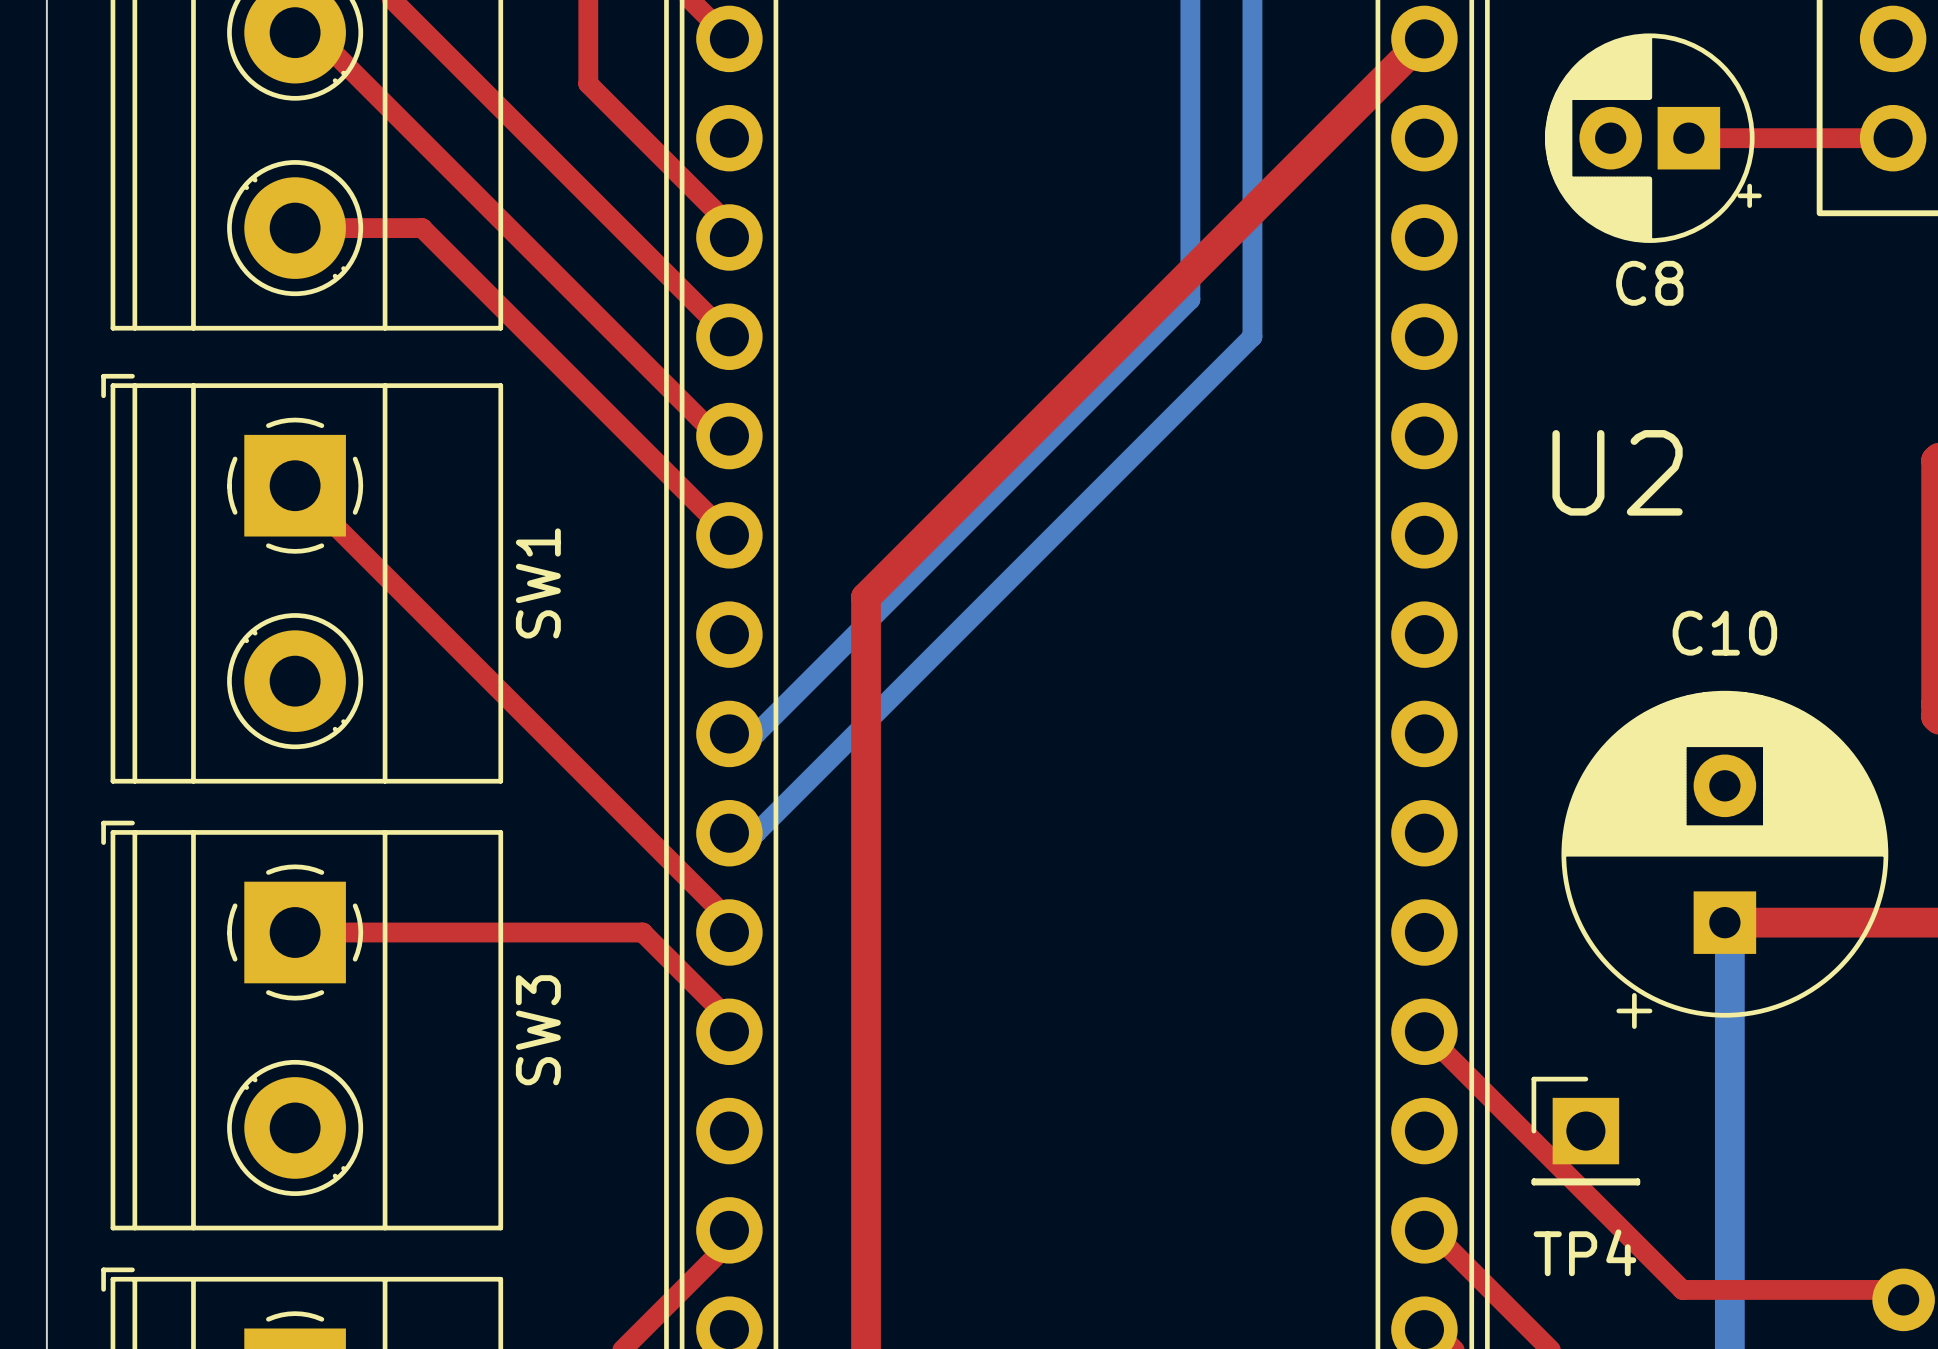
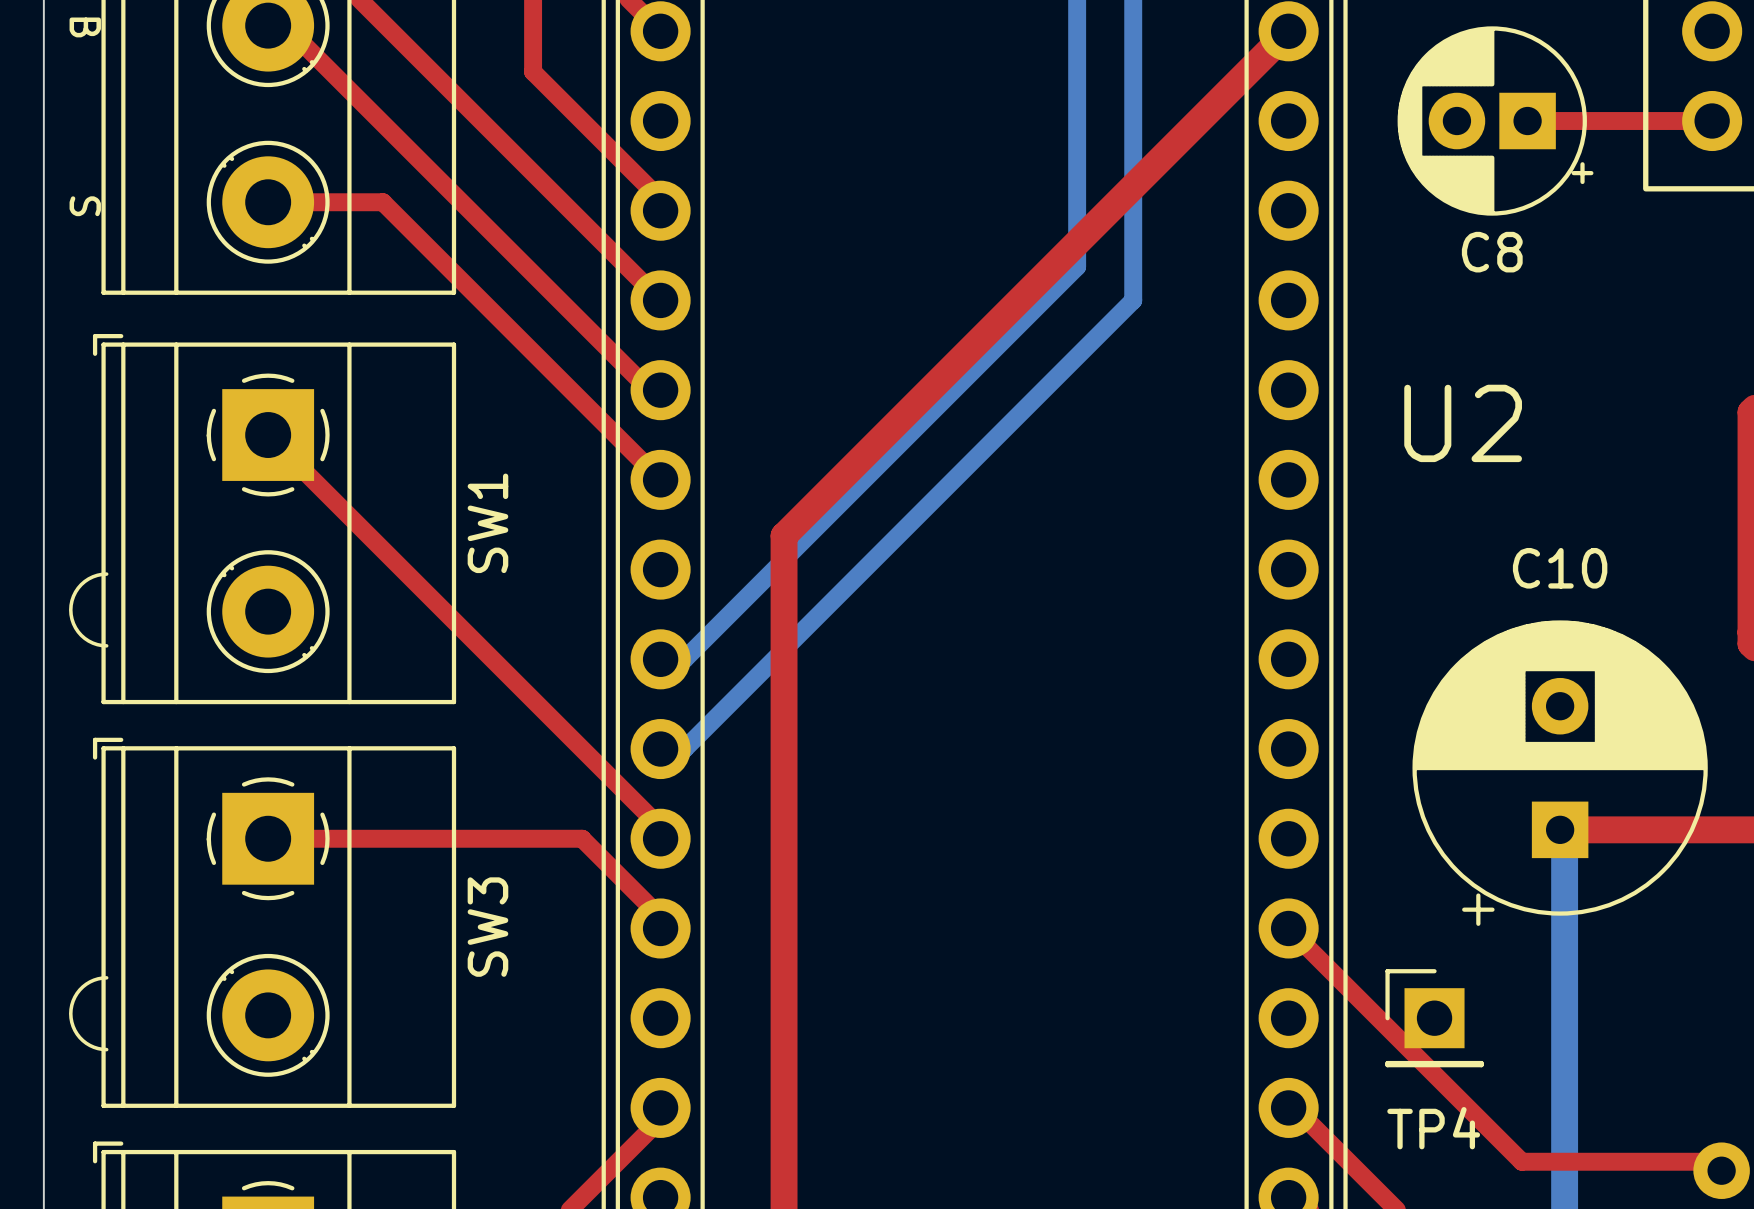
text: none -> B (85, 27)
text: none -> S (85, 206)
line: none -> (106, 574) (92, 576) (81, 584) (73, 596) (70, 609) (73, 623) (81, 635) (92, 643) (106, 645)
line: none -> (106, 977) (89, 981) (79, 989) (73, 1000) (70, 1013) (73, 1026) (82, 1040) (93, 1047) (106, 1049)

